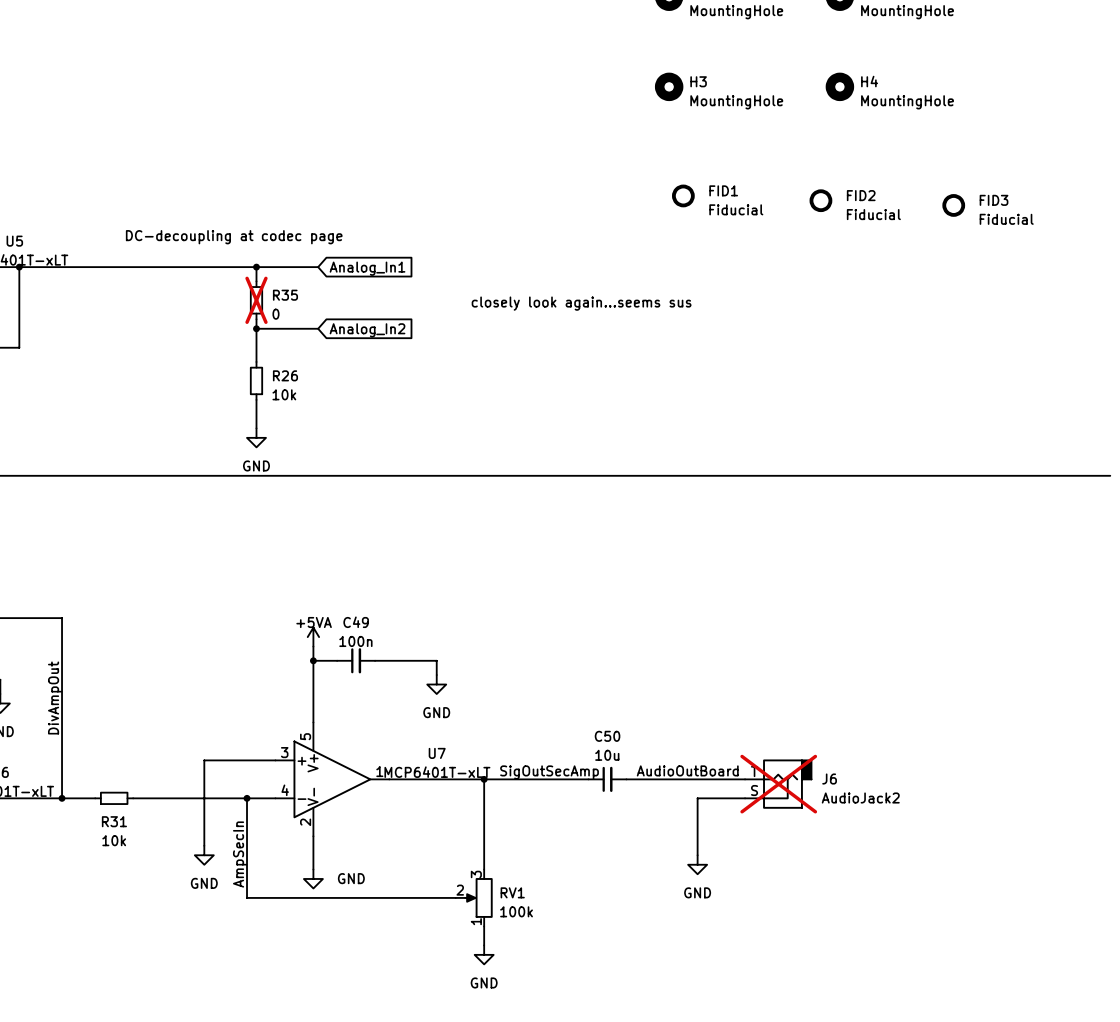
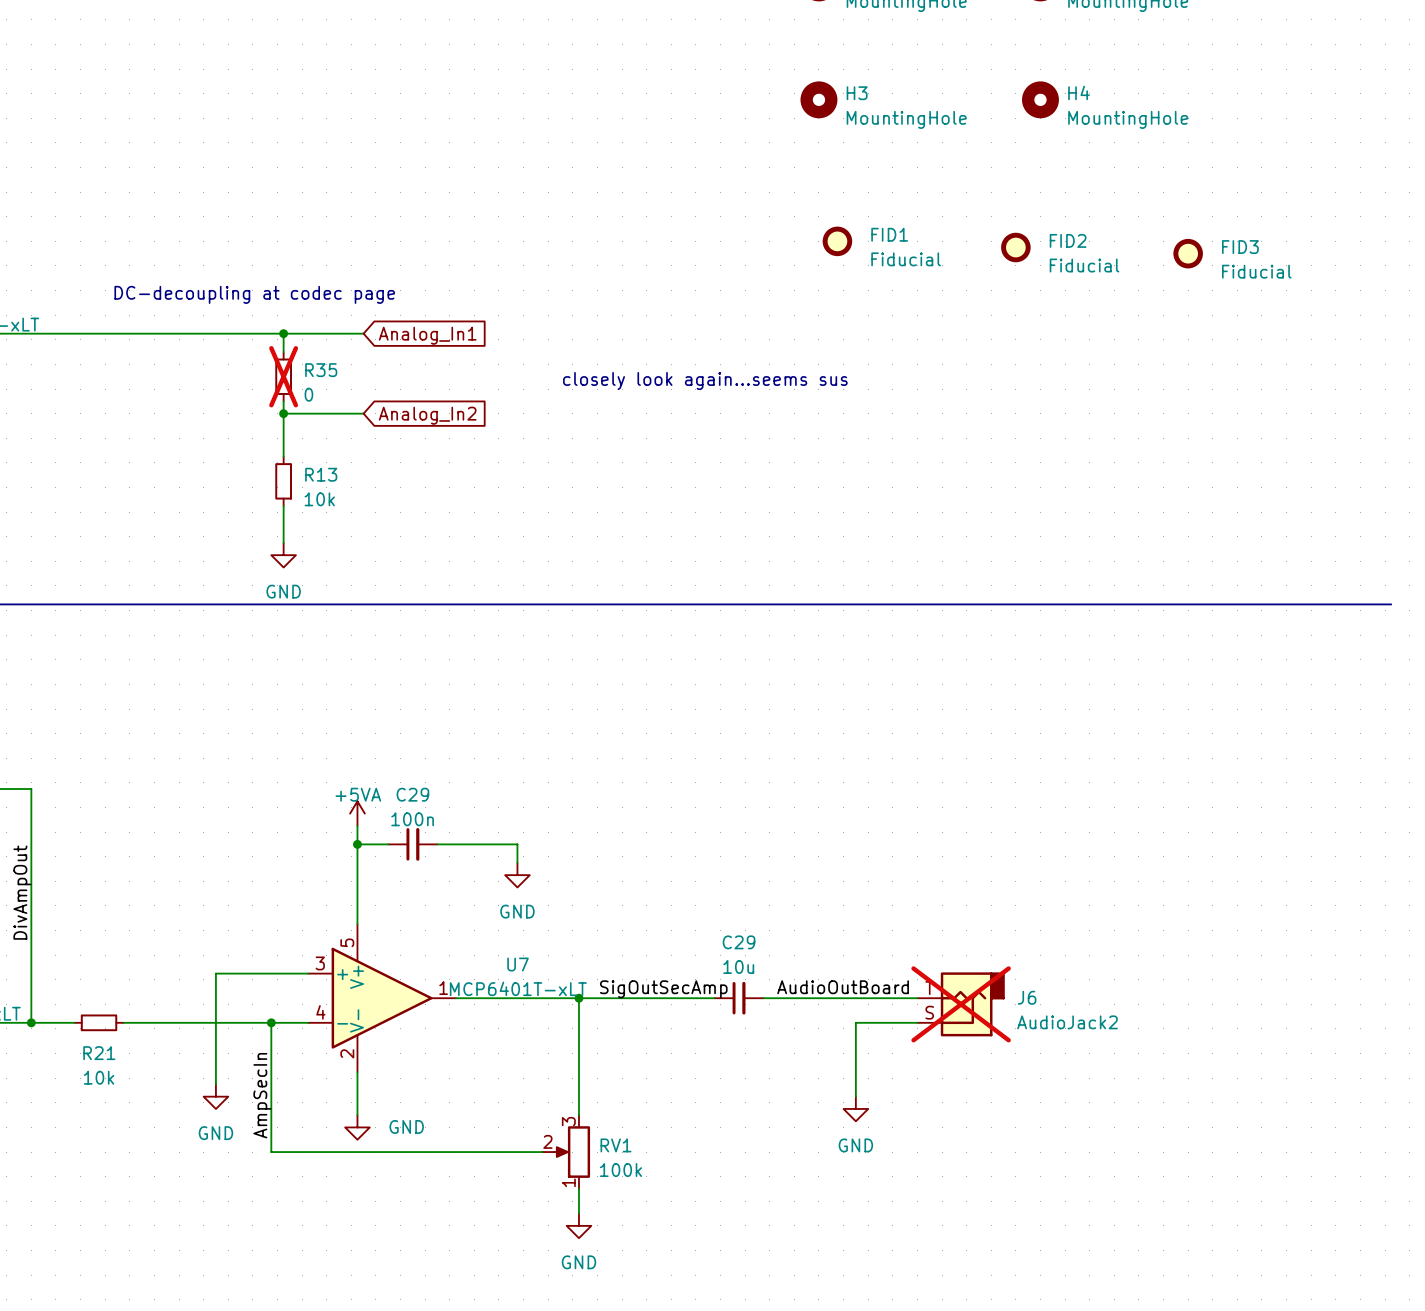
R26 name: R26 (285, 375) -> R13 (321, 474)
C49 name: C49 (356, 622) -> C29 (412, 794)
C50 name: C50 (607, 736) -> C29 (739, 942)
R31 name: R31 (114, 821) -> R21 (99, 1053)

